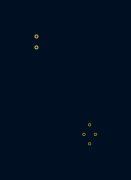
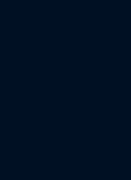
part: (36, 41) -> none
part: (89, 134) -> none

